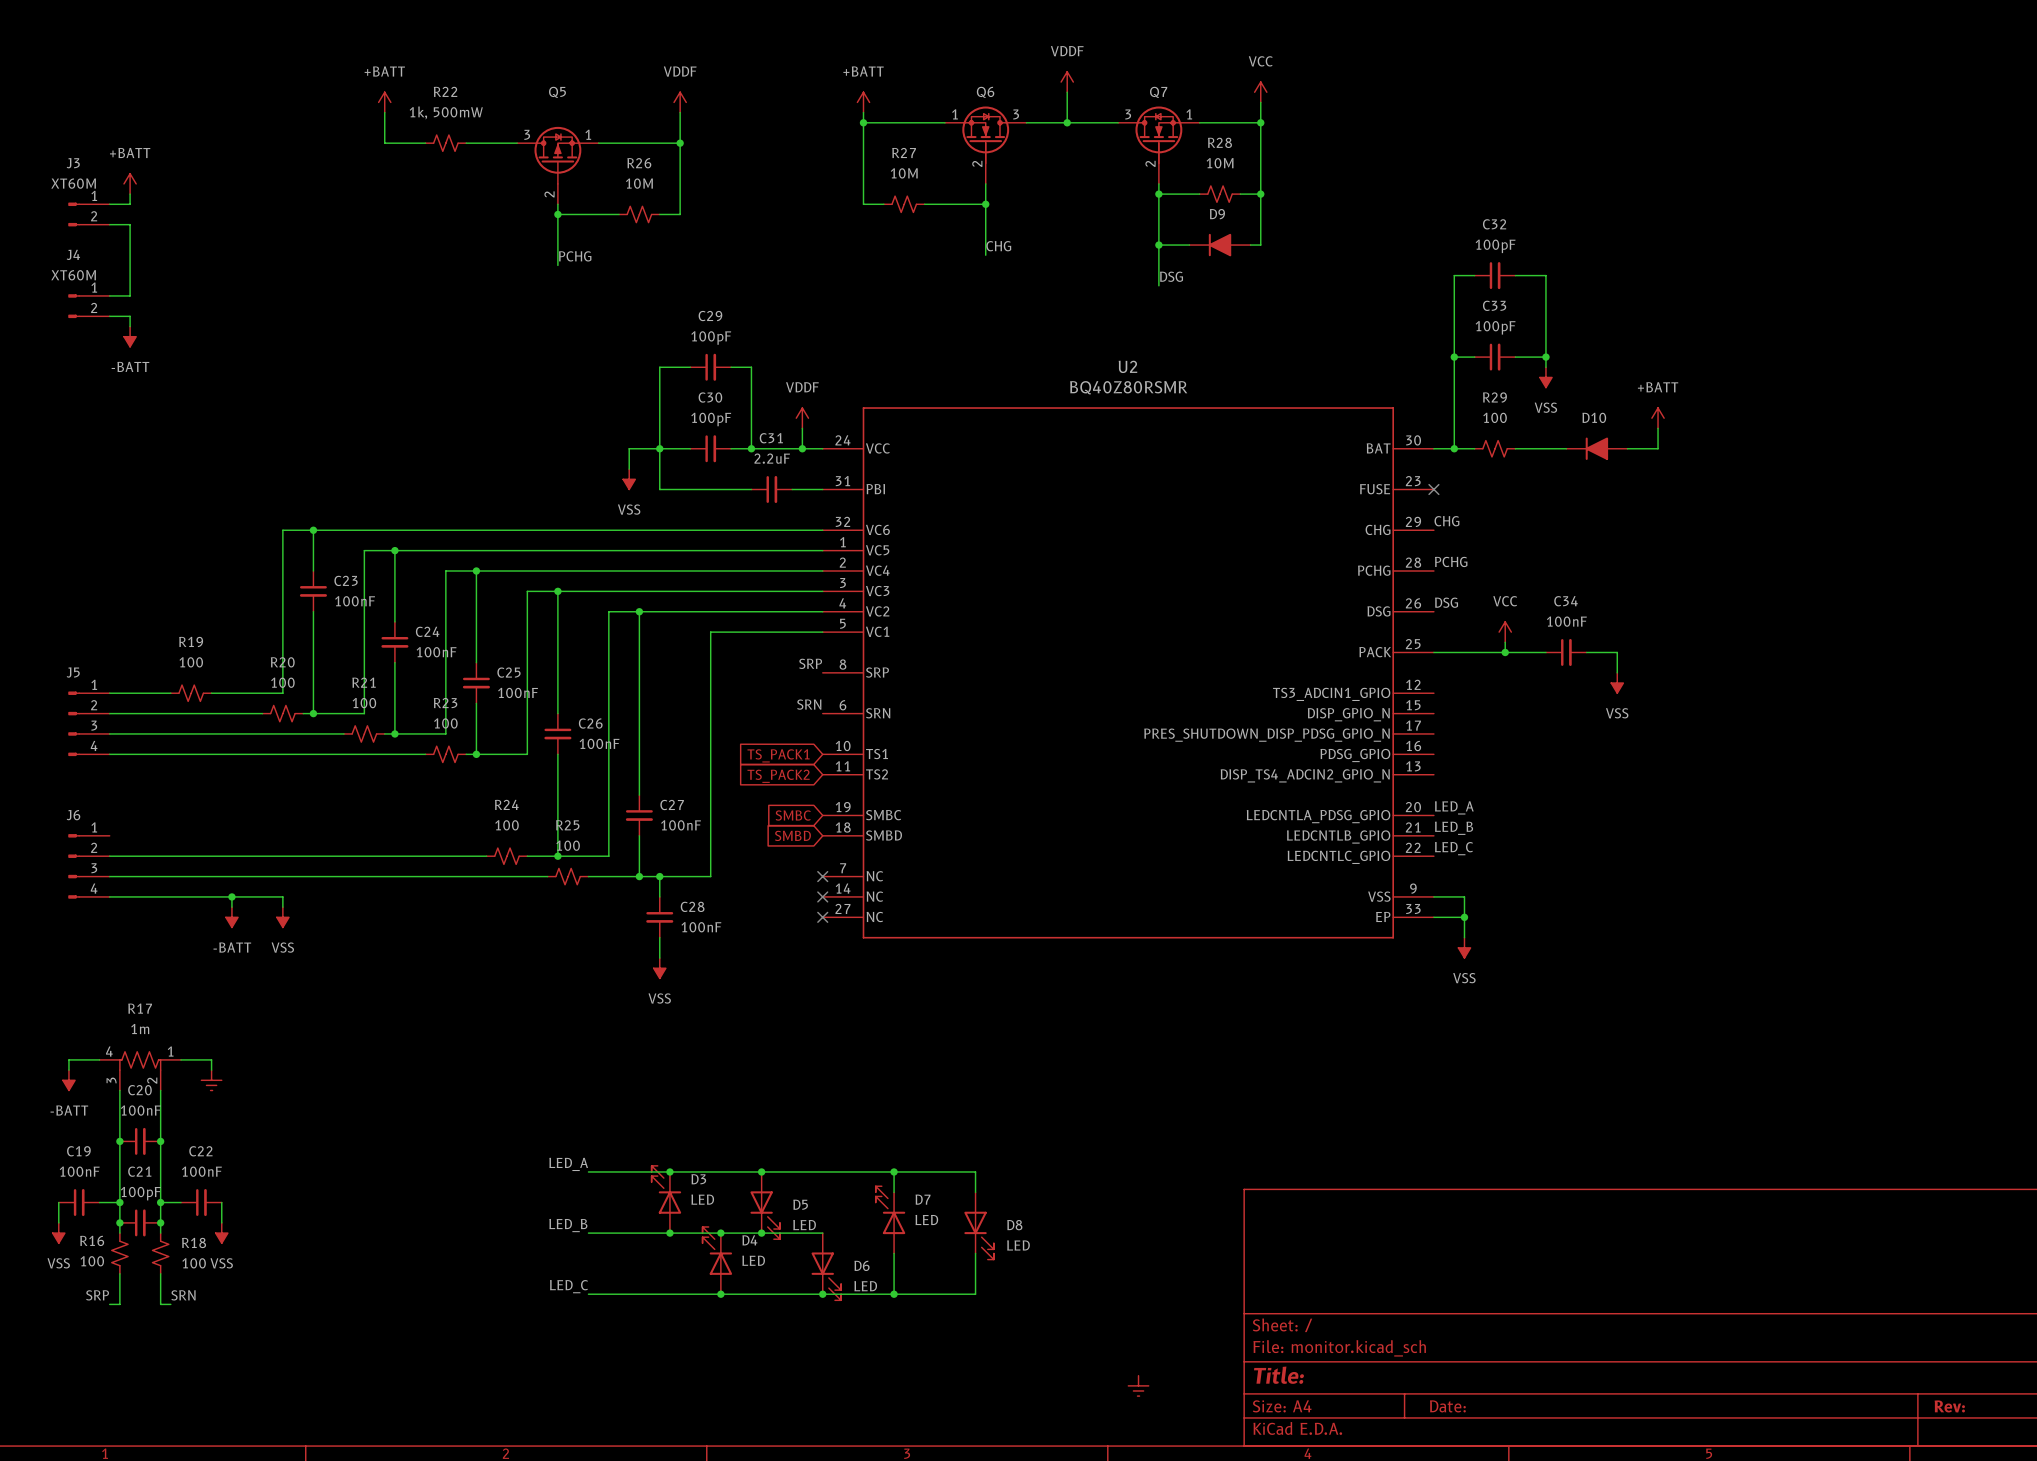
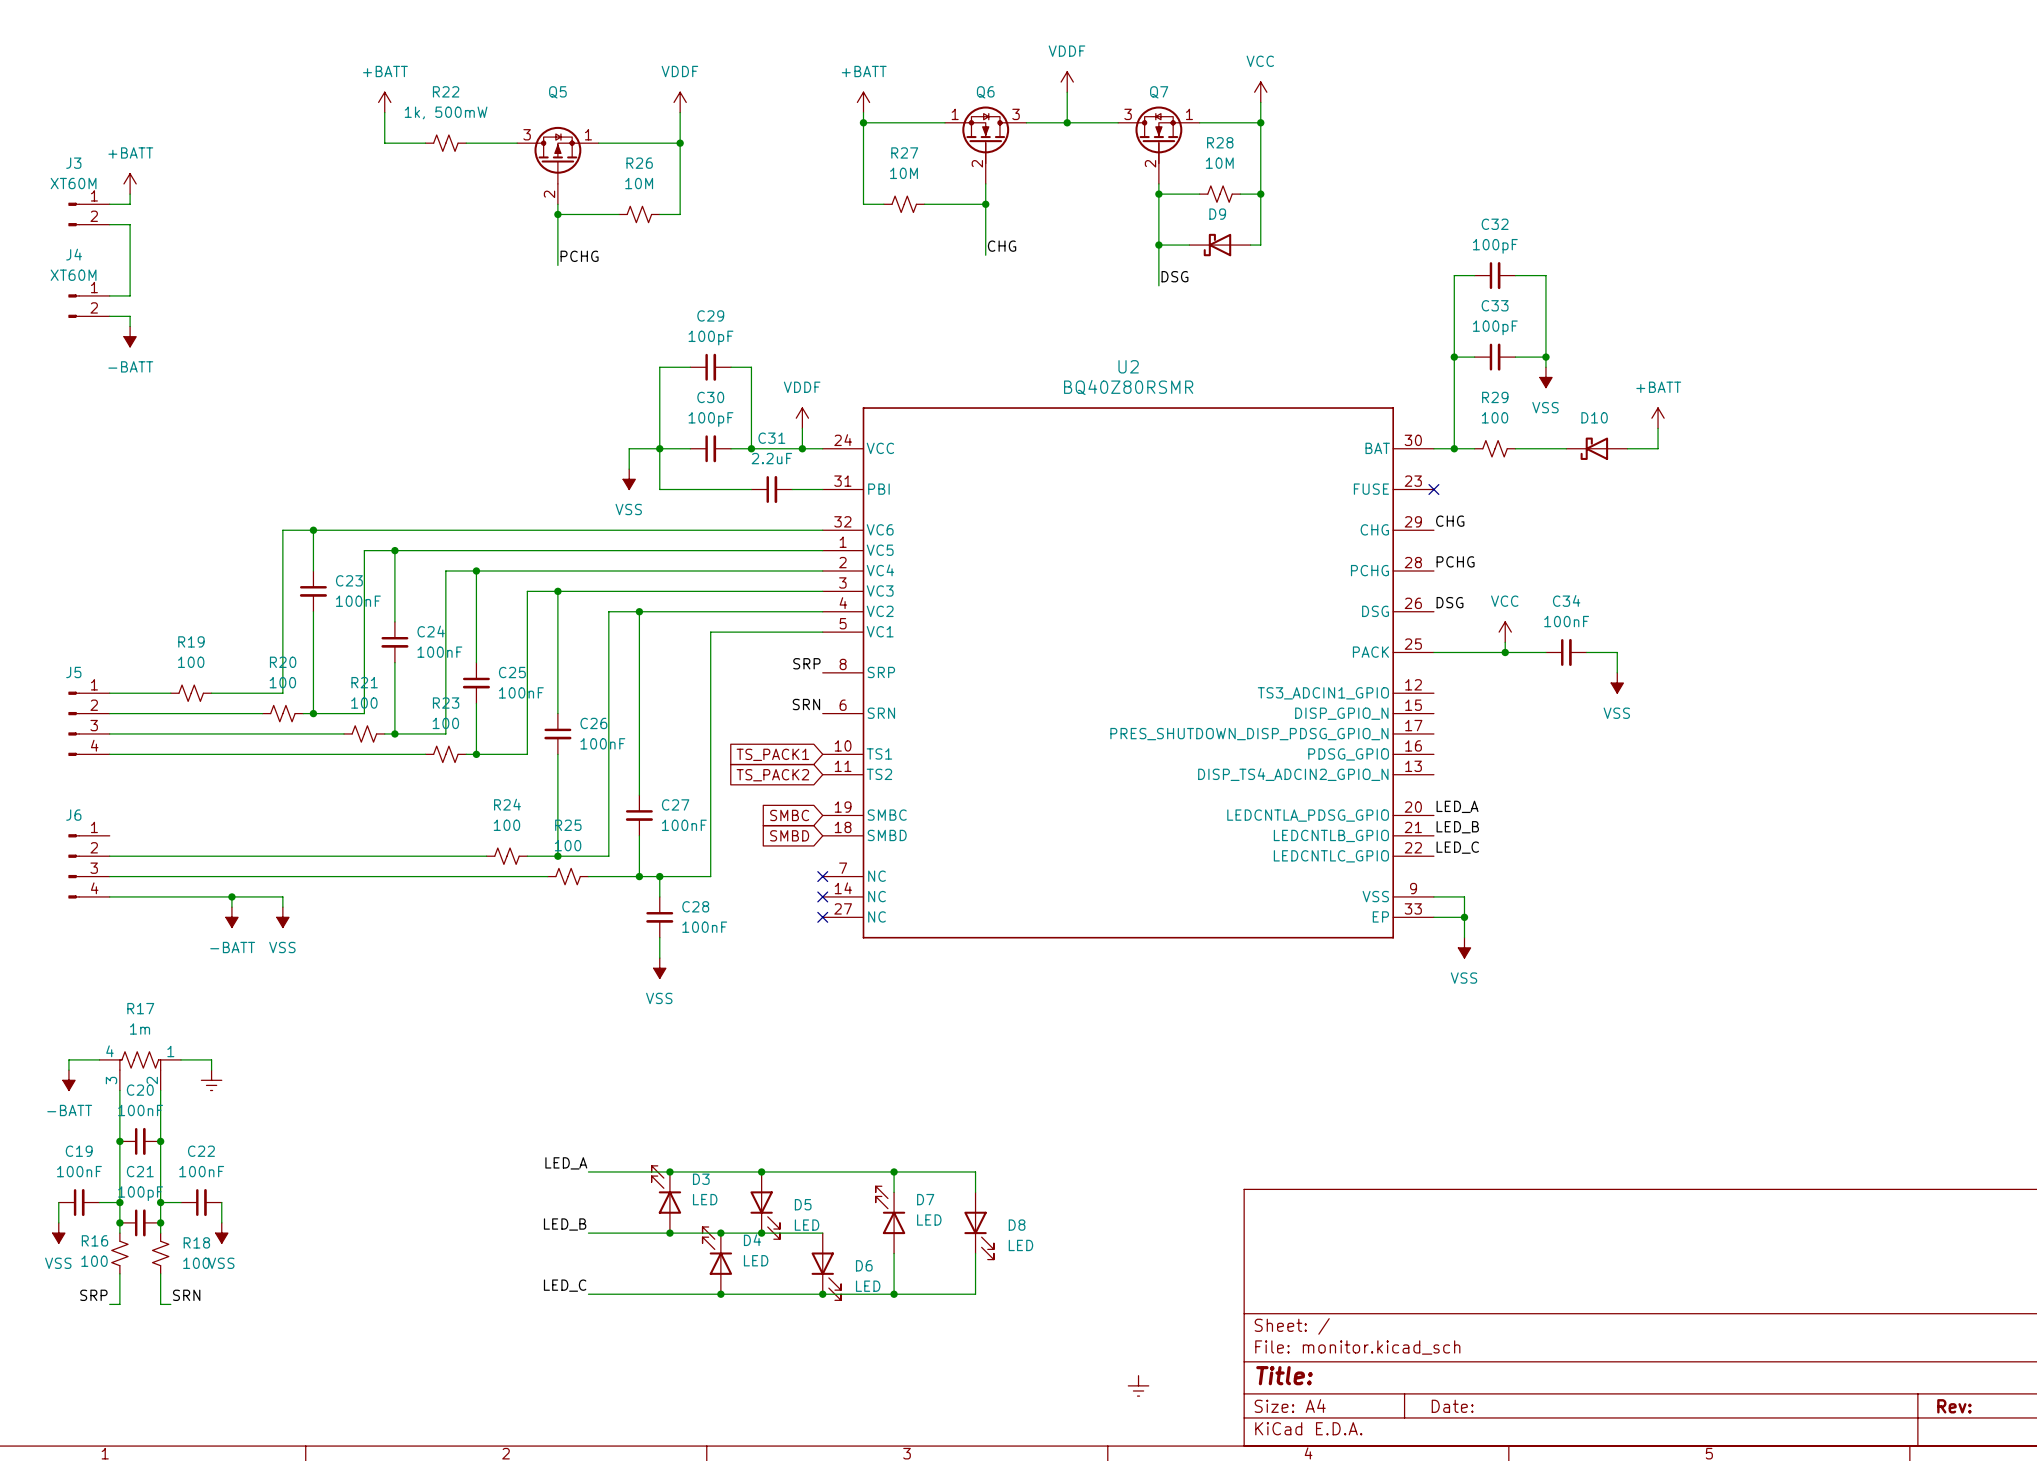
D9 symbol: [1189, 233, 1251, 257] -> [1189, 233, 1251, 257]
D10 symbol: [1566, 437, 1628, 460] -> [1566, 437, 1628, 460]

